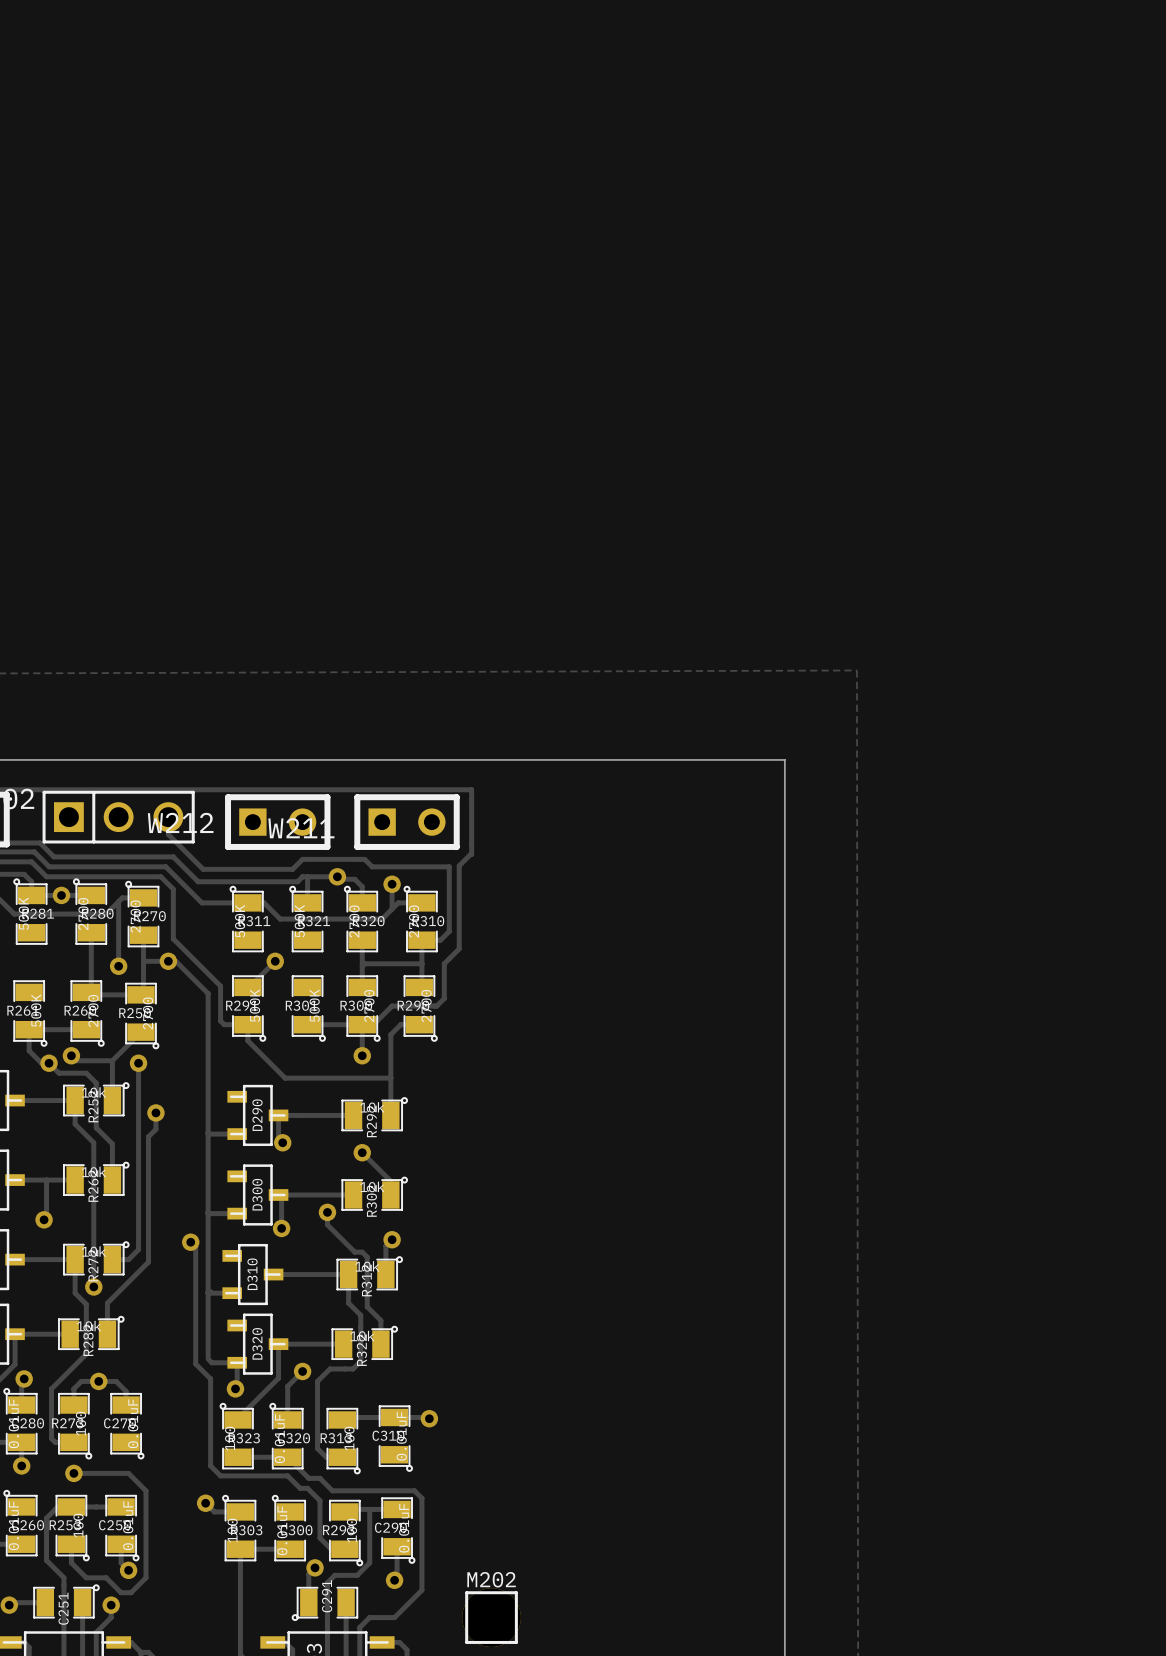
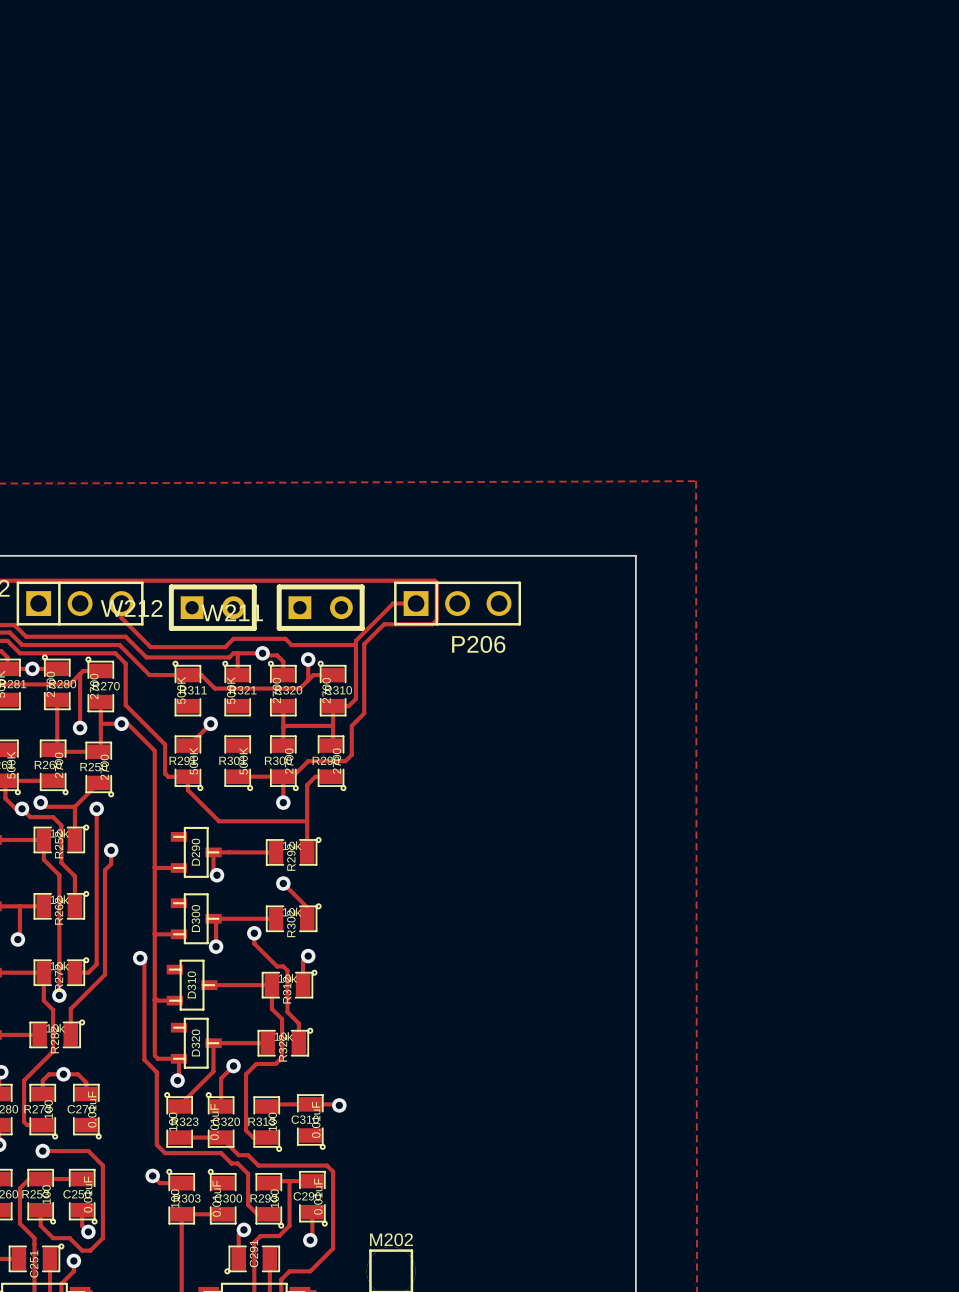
track: (471, 789) (470, 854) -> (374, 580) (434, 580) (436, 582) (436, 620) (432, 624) (384, 624) (373, 634)
track: none -> (416, 603) (393, 603) (355, 640) (355, 645)
P206: none -> (457, 603)

